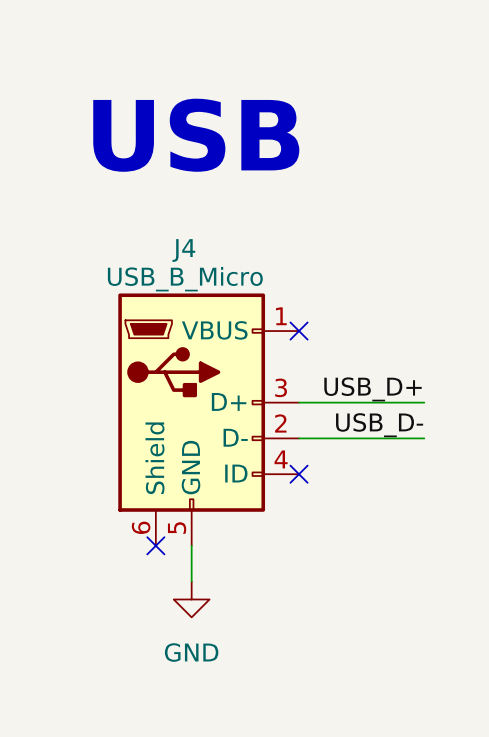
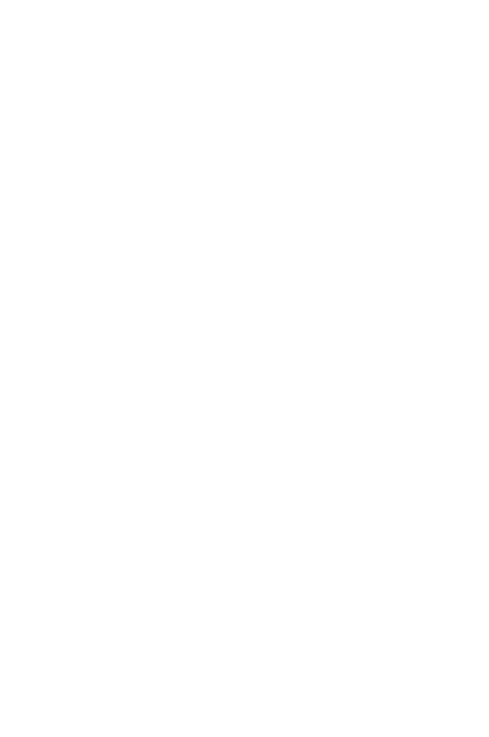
text: USB (196, 135) -> none
no-connect mark: (299, 331) -> none
label: USB_D+ (373, 389) -> none
wire: (299, 402) (424, 402) -> none
J4: USB_B_Micro (208, 419) -> none
label: USB_D- (379, 425) -> none
wire: (299, 438) (424, 438) -> none
no-connect mark: (299, 474) -> none
no-connect mark: (155, 545) -> none
wire: (191, 545) (191, 581) -> none
power symbol: GND (191, 599) -> none

